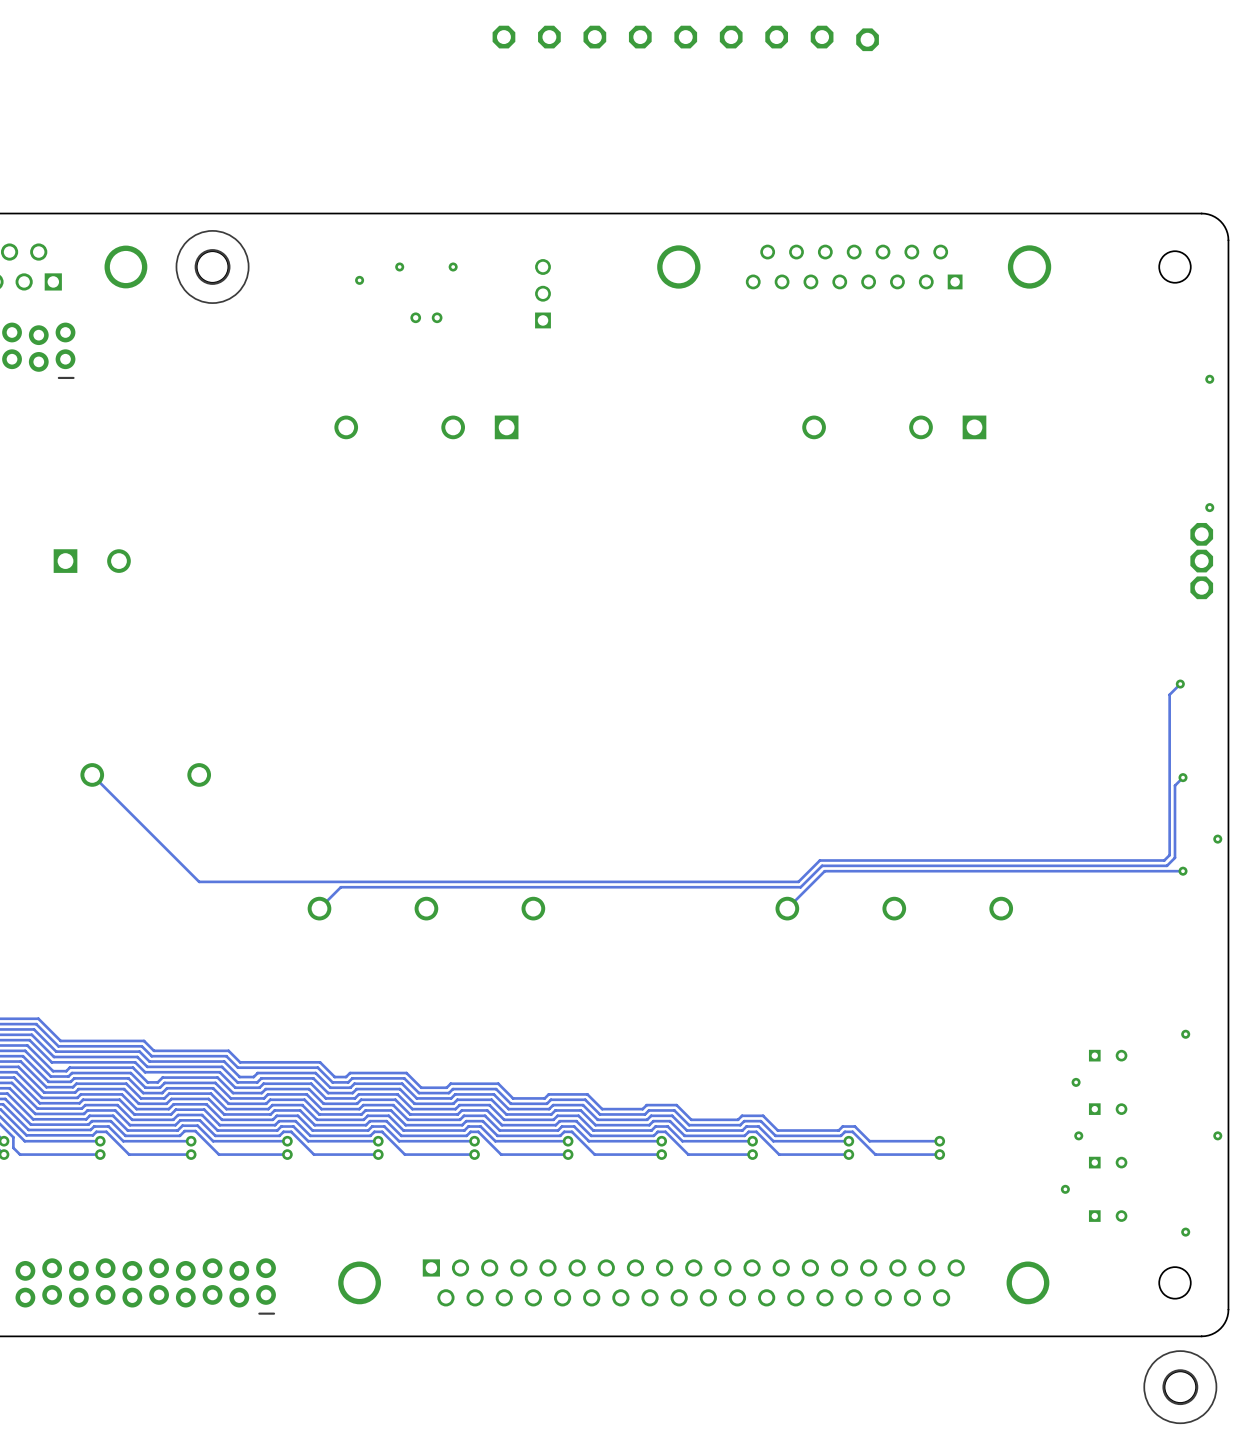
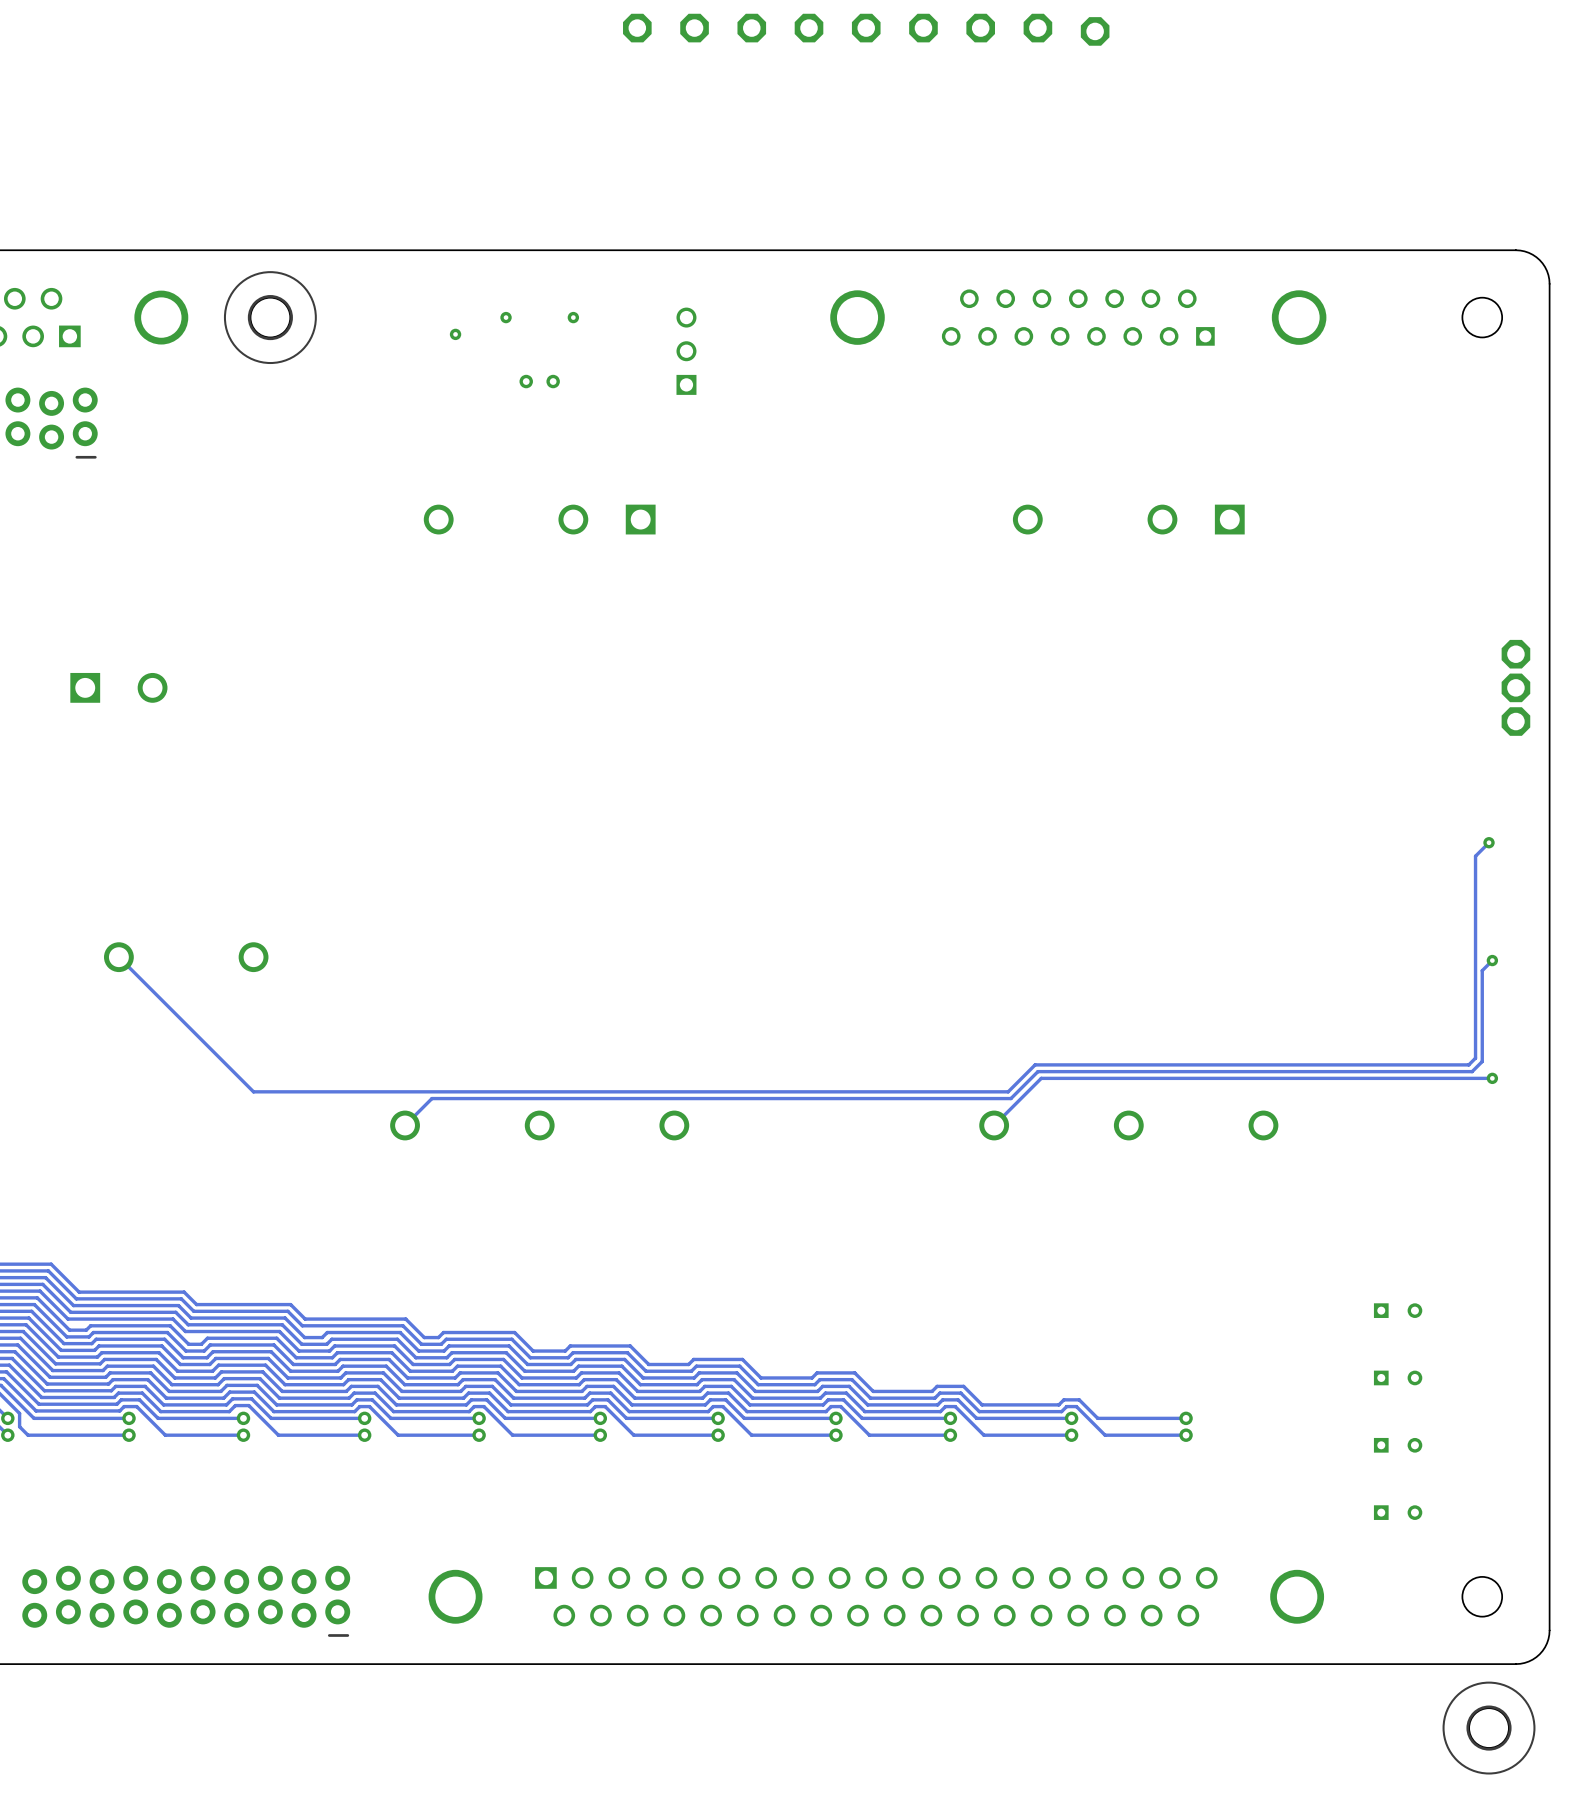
via: (1209, 379) -> none
via: (1209, 507) -> none
via: (1217, 839) -> none
via: (1185, 1034) -> none
via: (1076, 1082) -> none
via: (1078, 1135) -> none
via: (1217, 1135) -> none
via: (1065, 1189) -> none
via: (1185, 1232) -> none

